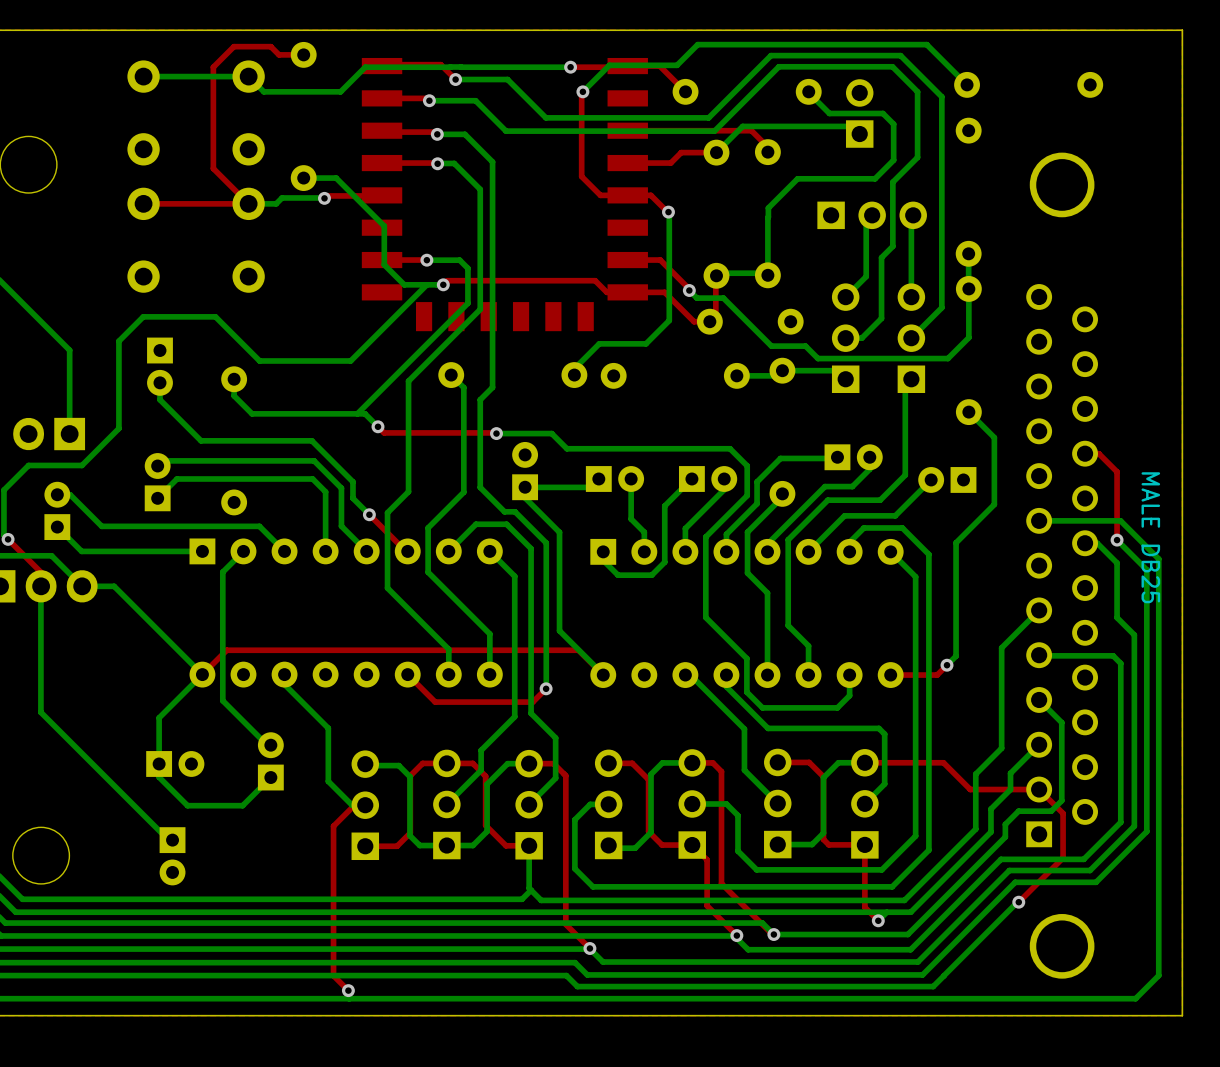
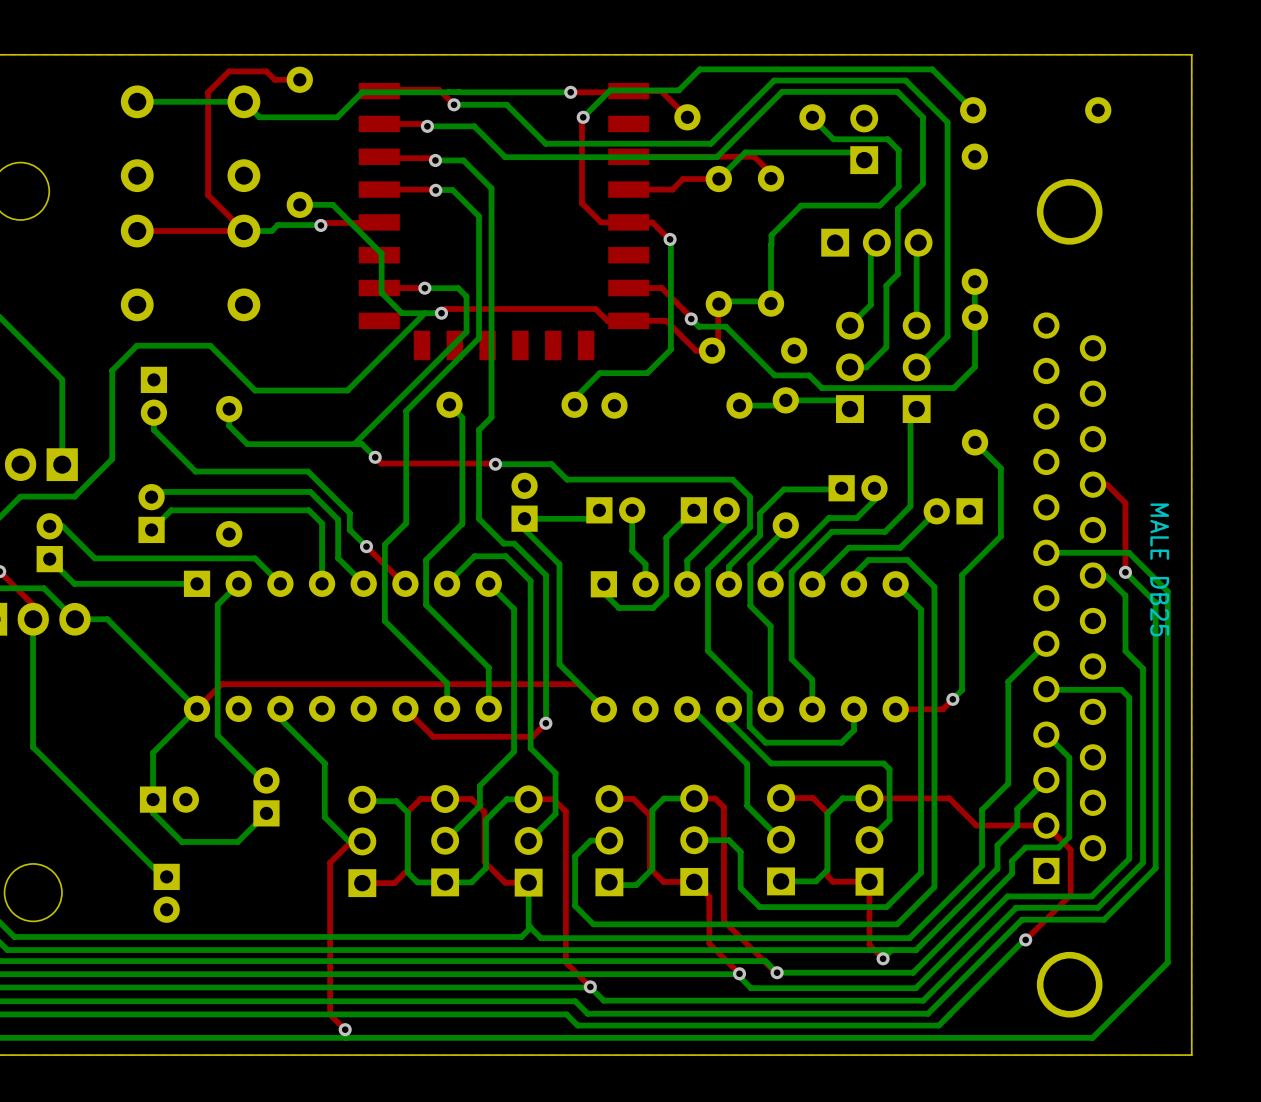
bottom track: (1158, 924) (1158, 975) (1135, 998) (1084, 998) -> (1167, 962) (1092, 1037)

